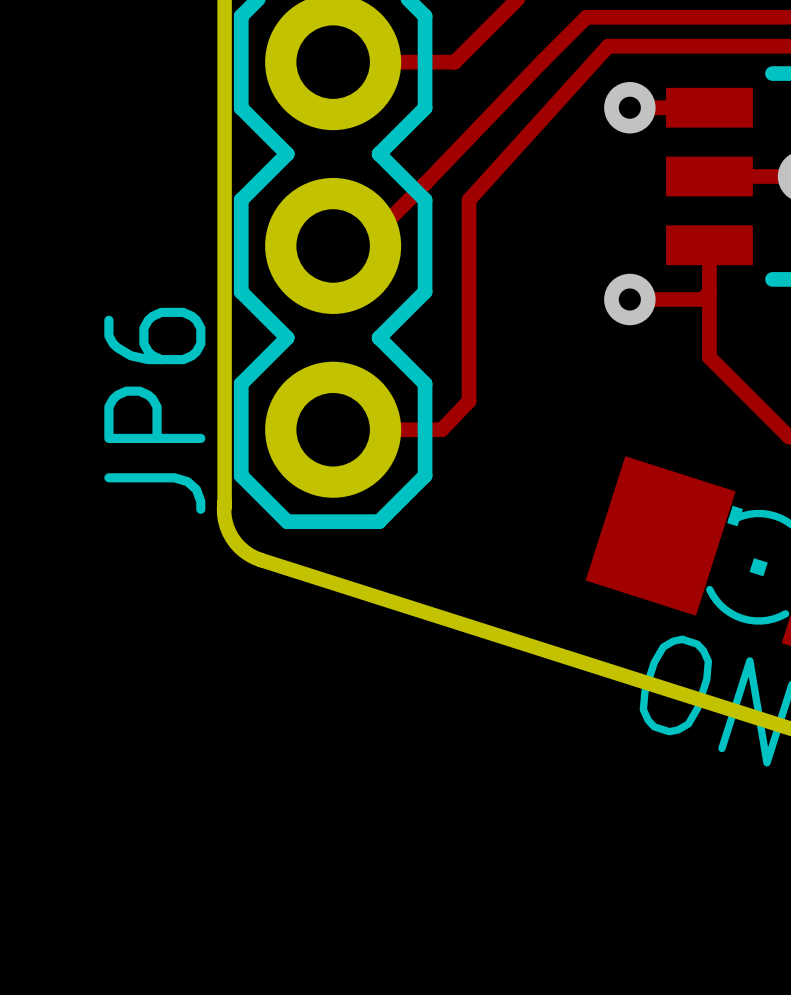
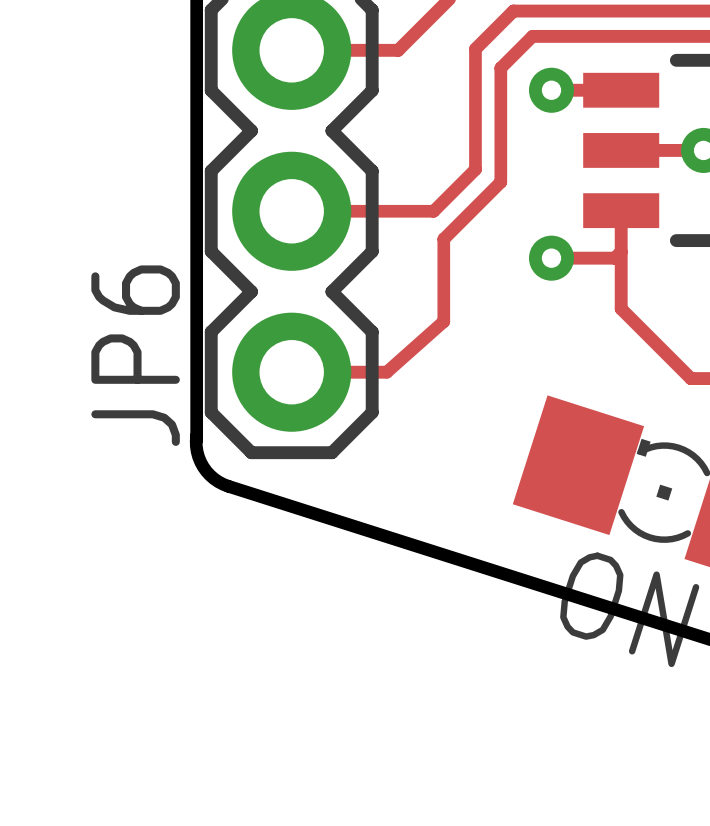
track: (608, 46) (469, 200) (469, 401) (441, 429) -> (532, 36) (500, 68) (500, 182) (443, 239) (443, 321) (386, 372)
track: (543, 60) (362, 245) -> (475, 49) (475, 169) (433, 211) (317, 211)

